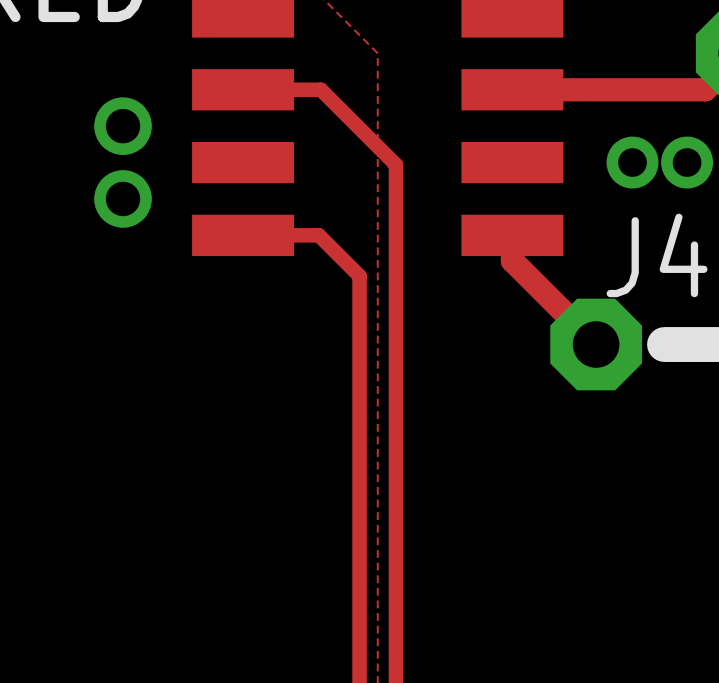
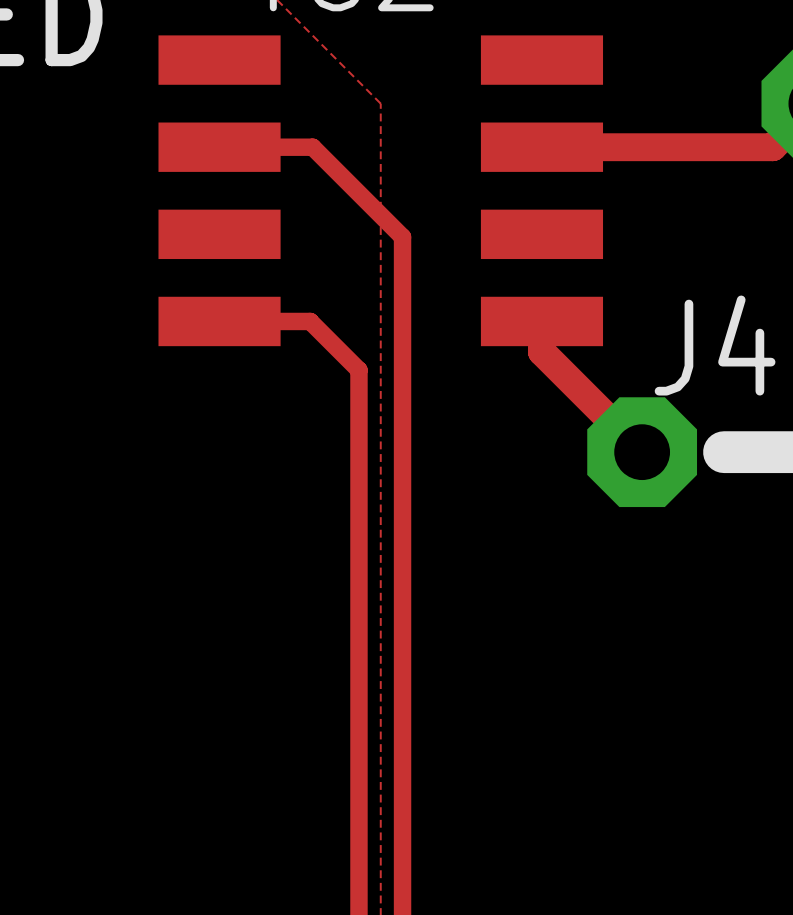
via: (123, 126) -> none
via: (632, 162) -> none
via: (687, 162) -> none
via: (123, 198) -> none

